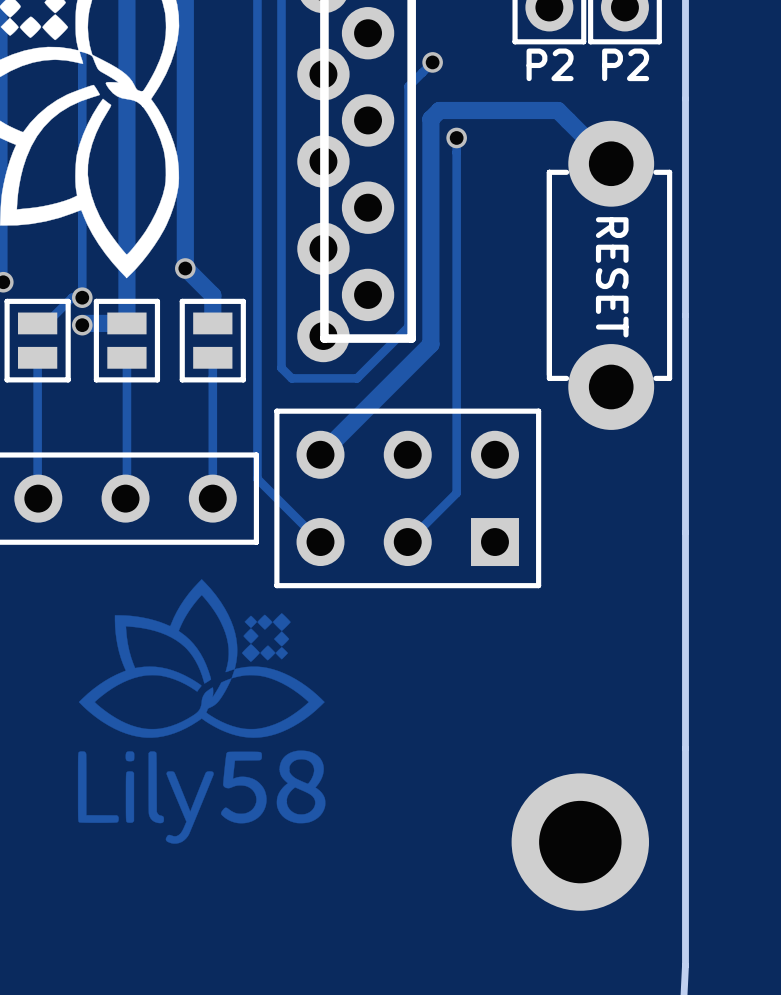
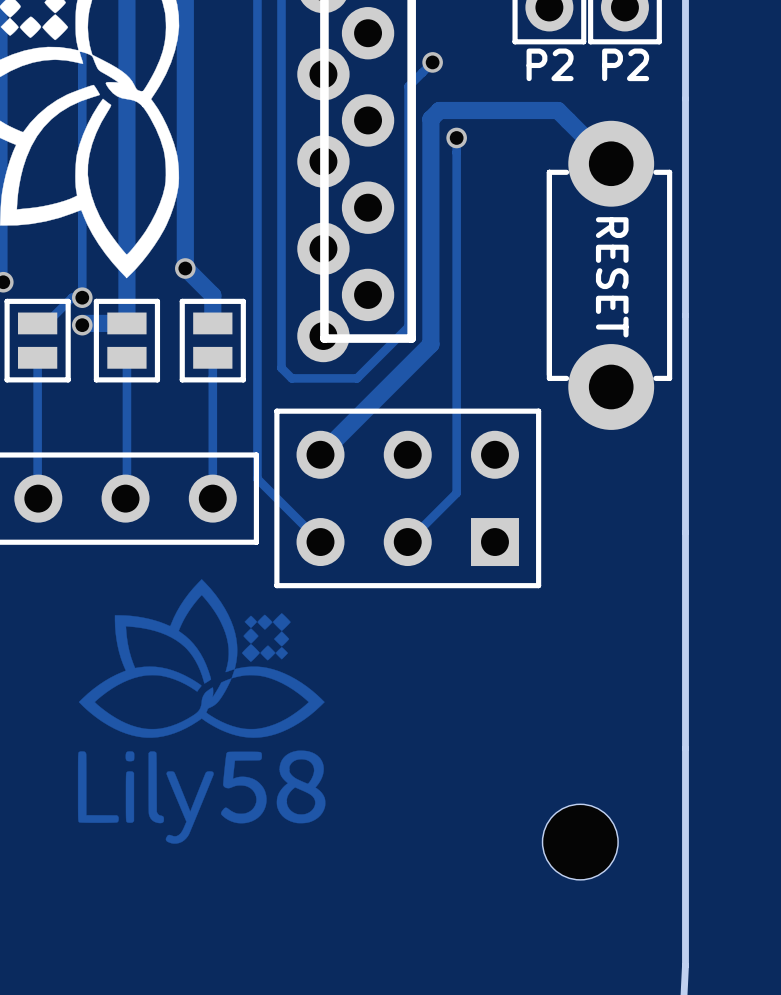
part footprint: [511, 773, 650, 911] -> [542, 804, 619, 880]

